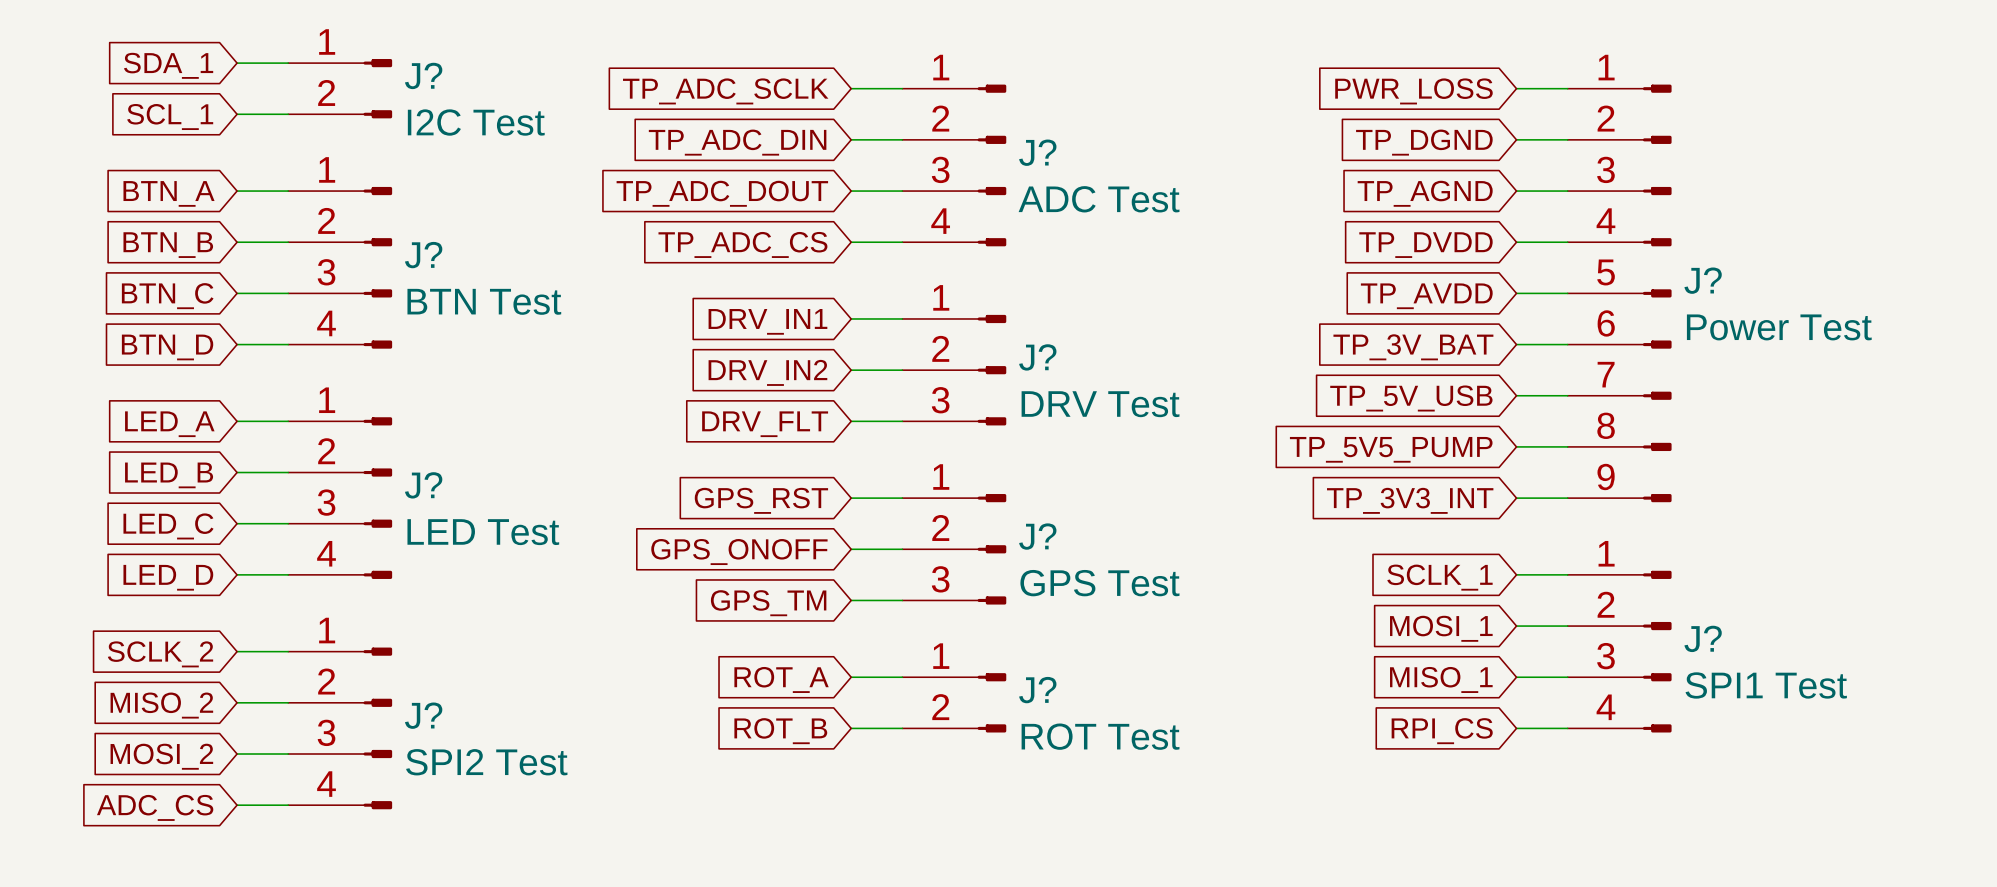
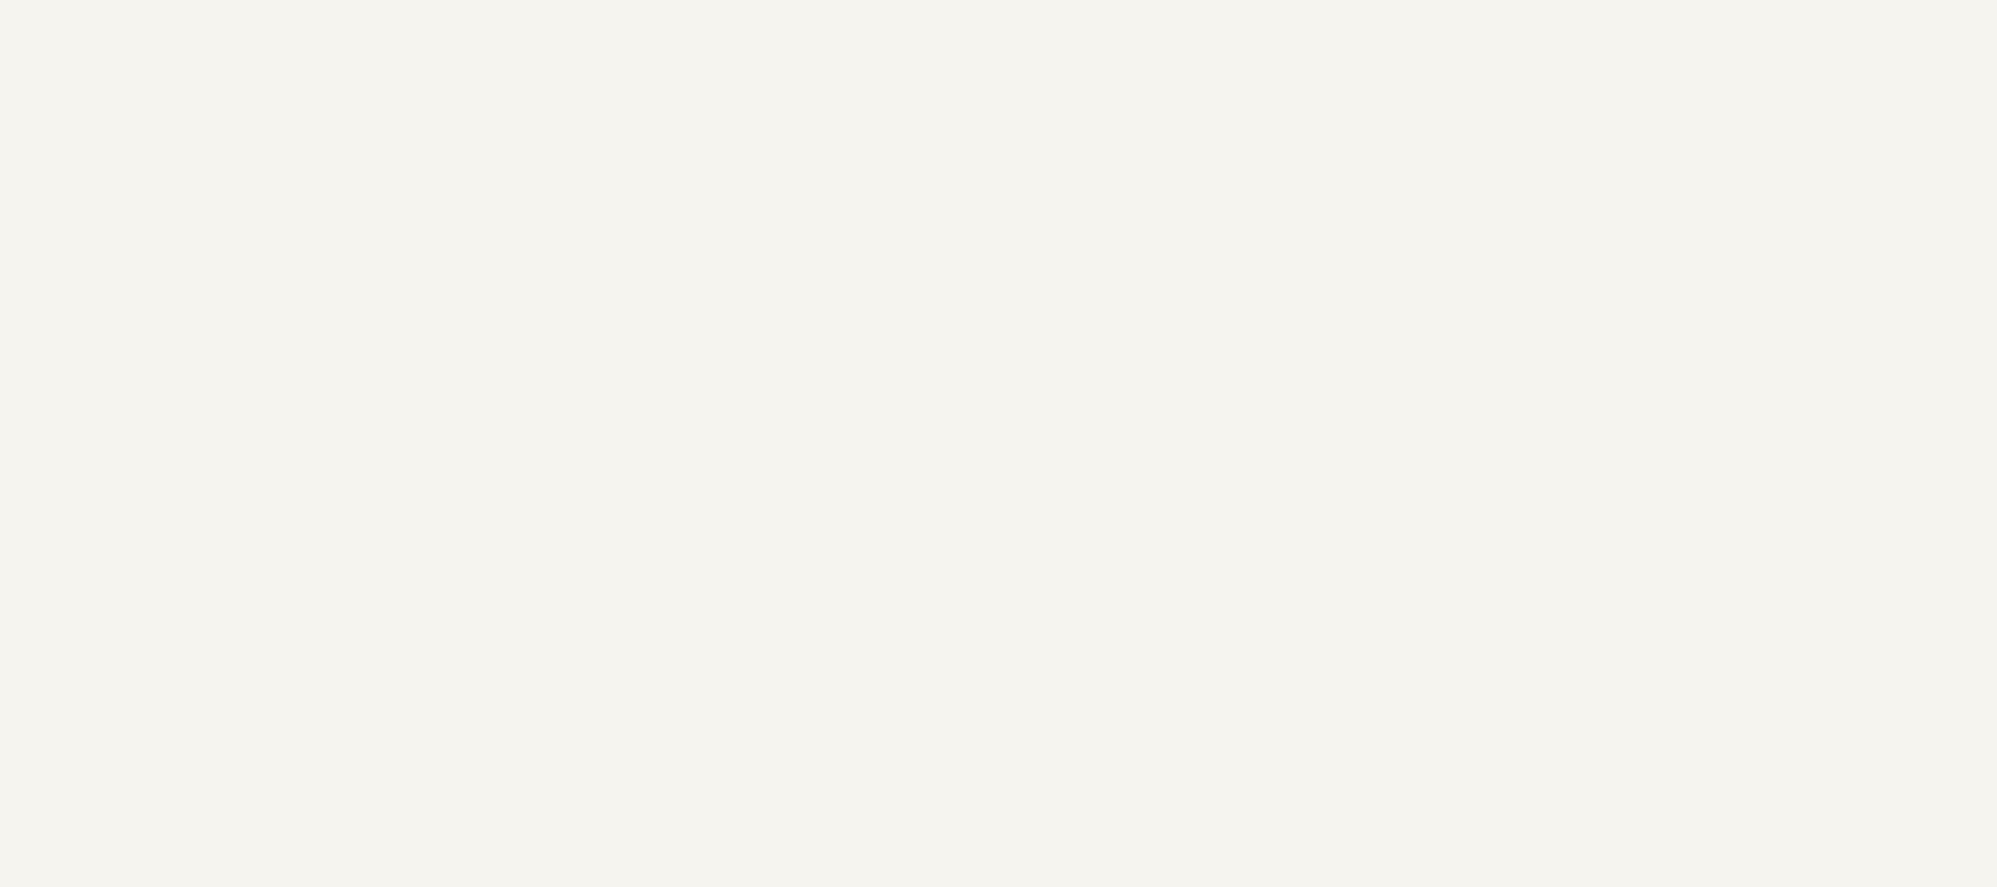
wire: (237, 63) (288, 63) -> none
global label: SDA_1 (168, 65) -> none
J?: I2C Test (340, 88) -> none
wire: (851, 88) (902, 88) -> none
wire: (1516, 88) (1567, 88) -> none
global label: TP_ADC_SCLK (725, 91) -> none
global label: PWR_LOSS (1413, 91) -> none
wire: (237, 114) (288, 114) -> none
global label: SCL_1 (170, 117) -> none
wire: (851, 139) (902, 139) -> none
wire: (1516, 139) (1567, 139) -> none
global label: TP_ADC_DIN (737, 142) -> none
global label: TP_DGND (1424, 142) -> none
J?: ADC Test (954, 165) -> none
wire: (237, 191) (288, 191) -> none
wire: (851, 191) (902, 191) -> none
wire: (1516, 191) (1567, 191) -> none
global label: BTN_A (169, 193) -> none
global label: TP_ADC_DOUT (722, 193) -> none
global label: TP_AGND (1425, 193) -> none
wire: (237, 242) (288, 242) -> none
wire: (851, 242) (902, 242) -> none
wire: (1516, 242) (1567, 242) -> none
global label: TP_ADC_CS (742, 244) -> none
global label: BTN_B (168, 245) -> none
global label: TP_DVDD (1425, 245) -> none
J?: BTN Test (340, 267) -> none
wire: (237, 293) (288, 293) -> none
wire: (1516, 293) (1567, 293) -> none
J?: Power Test (1619, 293) -> none
global label: BTN_C (167, 296) -> none
global label: TP_AVDD (1426, 296) -> none
wire: (851, 318) (902, 318) -> none
global label: DRV_IN1 (767, 321) -> none
wire: (237, 344) (288, 344) -> none
wire: (1516, 344) (1567, 344) -> none
global label: BTN_D (167, 347) -> none
global label: TP_3V_BAT (1413, 347) -> none
wire: (851, 370) (902, 370) -> none
J?: DRV Test (954, 370) -> none
global label: DRV_IN2 (767, 372) -> none
wire: (1516, 395) (1567, 395) -> none
global label: TP_5V_USB (1411, 398) -> none
wire: (237, 421) (288, 421) -> none
wire: (851, 421) (902, 421) -> none
global label: LED_A (169, 424) -> none
global label: DRV_FLT (765, 424) -> none
wire: (1516, 446) (1567, 446) -> none
global label: TP_5V5_PUMP (1391, 449) -> none
wire: (237, 472) (288, 472) -> none
global label: LED_B (169, 475) -> none
J?: LED Test (340, 498) -> none
wire: (851, 498) (902, 498) -> none
wire: (1516, 498) (1567, 498) -> none
global label: GPS_RST (761, 500) -> none
global label: TP_3V3_INT (1410, 500) -> none
wire: (237, 523) (288, 523) -> none
global label: LED_C (168, 526) -> none
wire: (851, 549) (902, 549) -> none
J?: GPS Test (954, 549) -> none
global label: GPS_ONOFF (739, 552) -> none
wire: (237, 574) (288, 574) -> none
wire: (1516, 574) (1567, 574) -> none
global label: LED_D (168, 577) -> none
global label: SCLK_1 (1439, 577) -> none
wire: (851, 600) (902, 600) -> none
global label: GPS_TM (768, 603) -> none
wire: (1516, 626) (1567, 626) -> none
global label: MOSI_1 (1441, 628) -> none
wire: (237, 651) (288, 651) -> none
J?: SPI1 Test (1619, 651) -> none
global label: SCLK_2 (160, 654) -> none
wire: (851, 677) (902, 677) -> none
wire: (1516, 677) (1567, 677) -> none
global label: ROT_A (781, 679) -> none
global label: MISO_1 (1441, 679) -> none
wire: (237, 702) (288, 702) -> none
J?: ROT Test (954, 702) -> none
global label: MISO_2 (161, 705) -> none
J?: SPI2 Test (340, 728) -> none
wire: (851, 728) (902, 728) -> none
wire: (1516, 728) (1567, 728) -> none
global label: ROT_B (780, 731) -> none
global label: RPI_CS (1442, 731) -> none
wire: (237, 754) (288, 754) -> none
global label: MOSI_2 (161, 756) -> none
wire: (237, 805) (288, 805) -> none
global label: ADC_CS (155, 807) -> none

